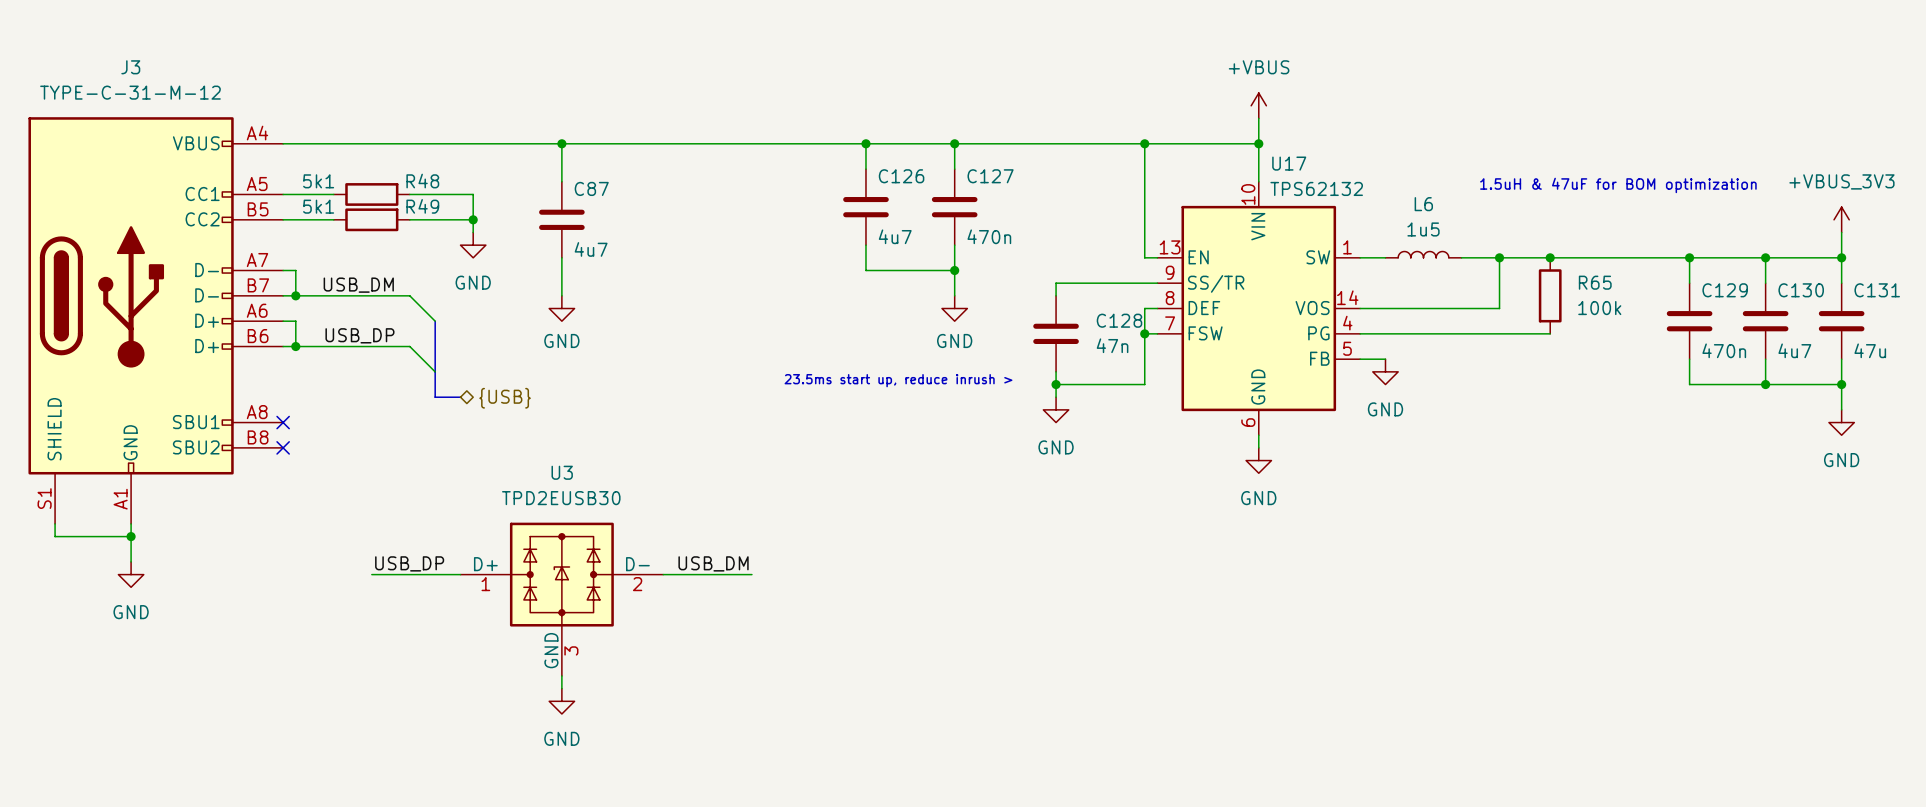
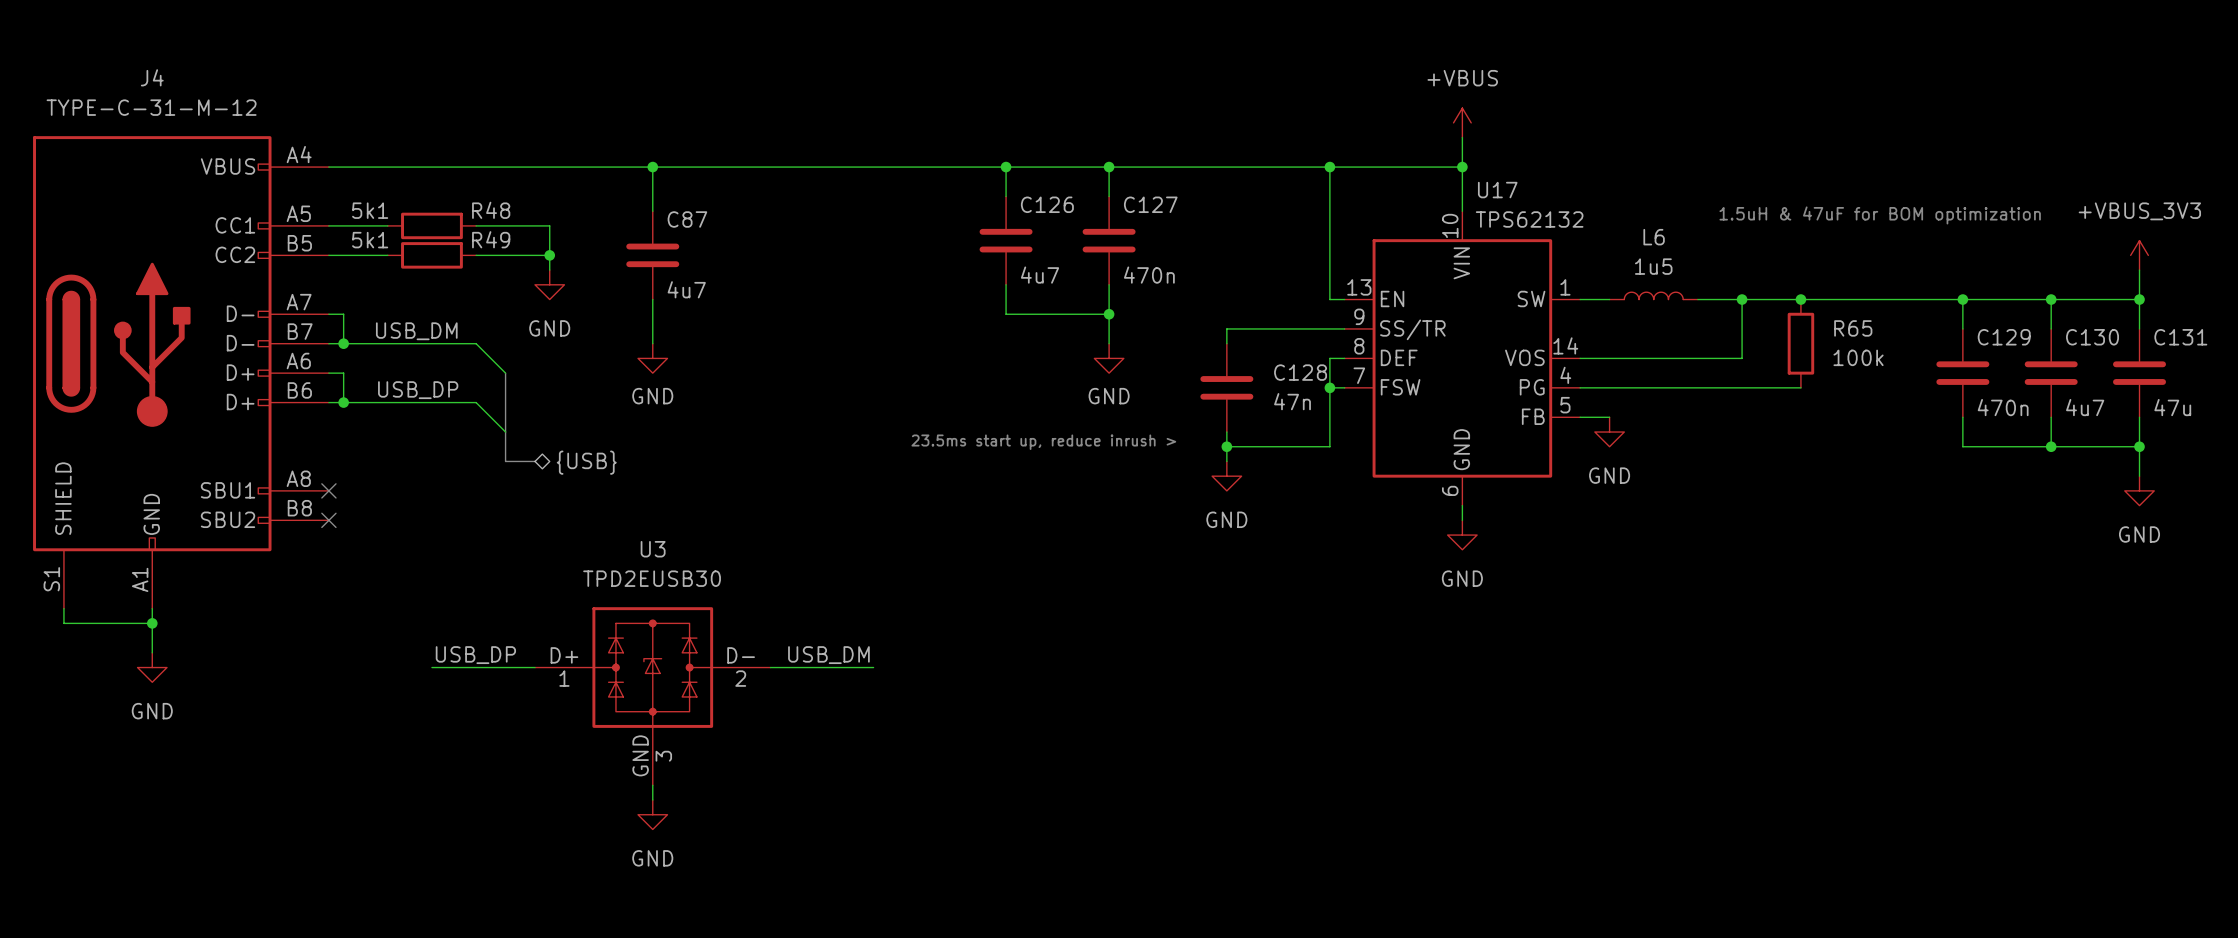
J3 name: J3 (130, 67) -> J4 (152, 77)

